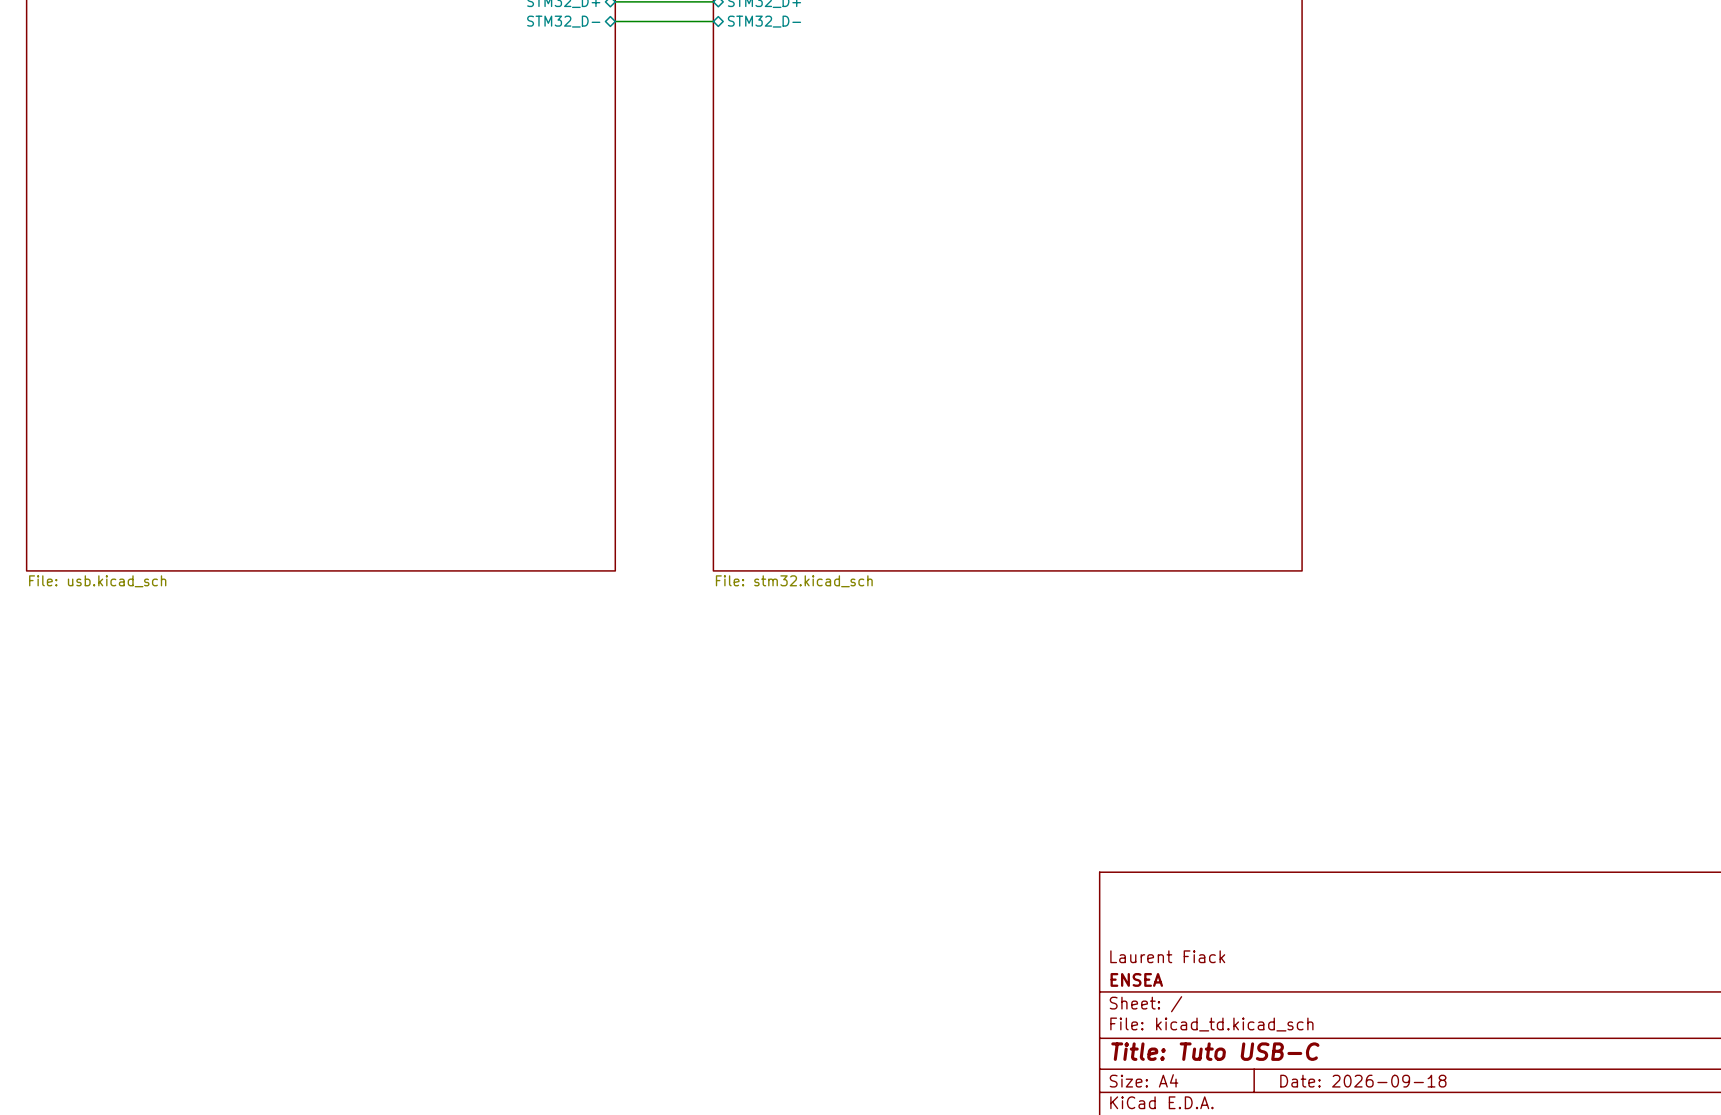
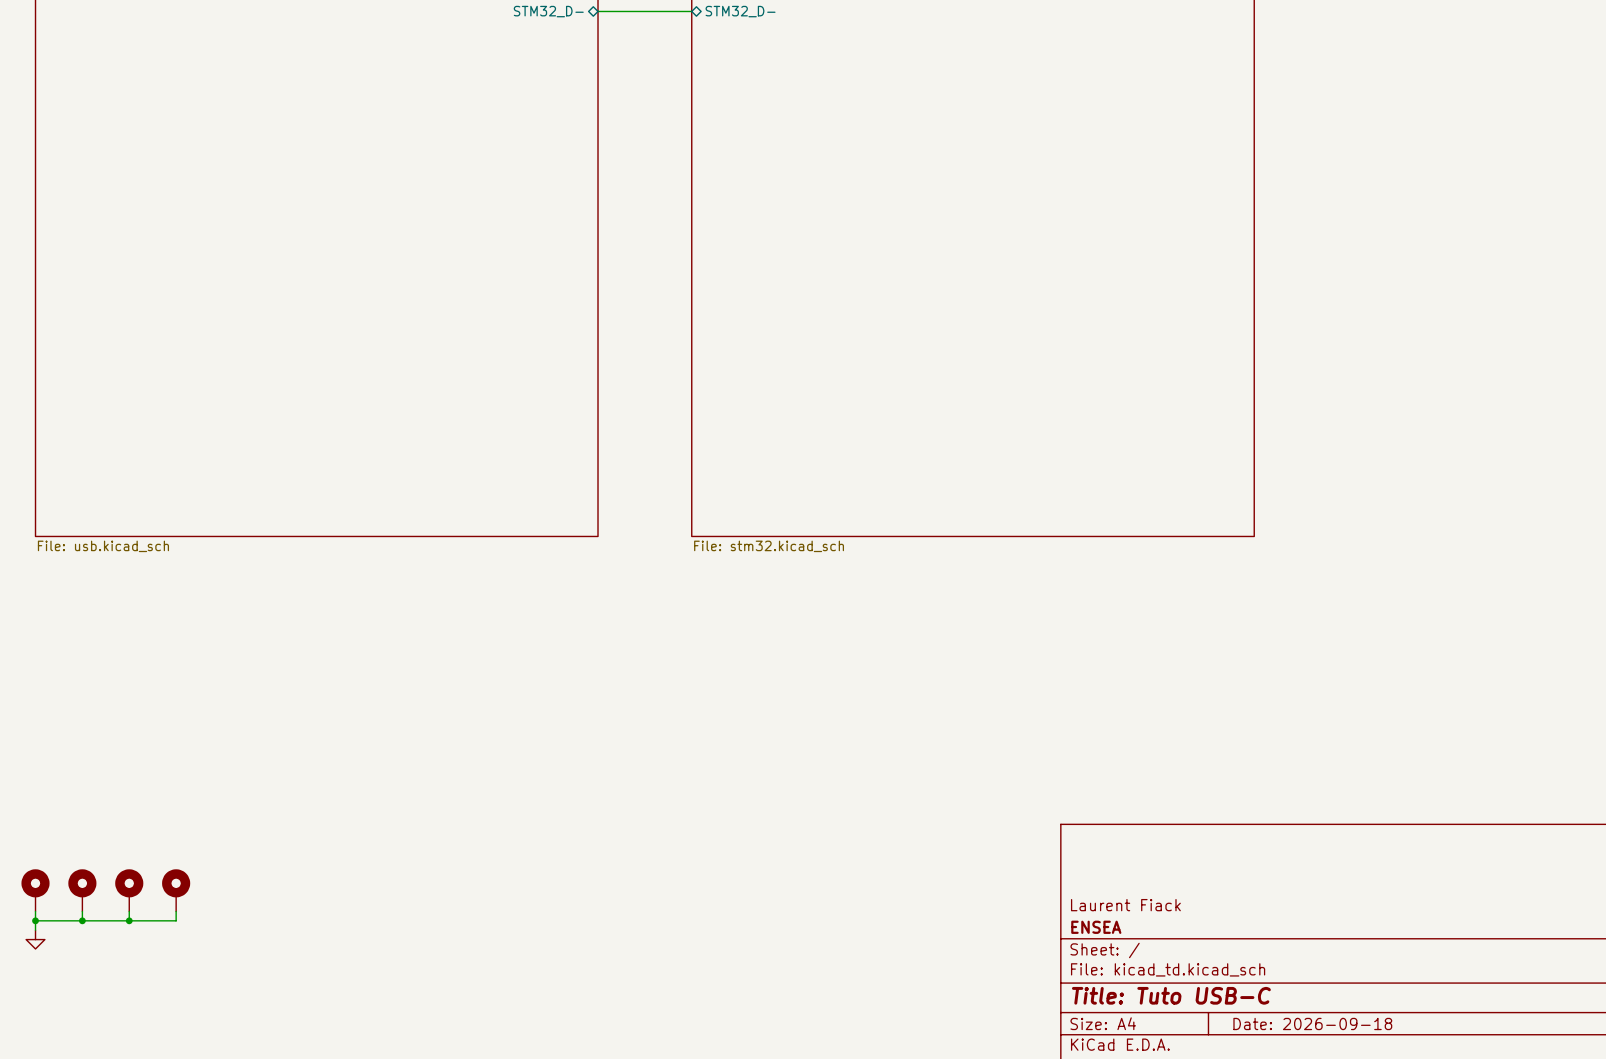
part: none -> (35, 890)
part: none -> (82, 890)
part: none -> (129, 890)
part: none -> (176, 890)
wire: none -> (35, 911) (35, 930)
wire: none -> (82, 911) (82, 920)
wire: none -> (129, 911) (129, 920)
wire: none -> (176, 911) (176, 920) (35, 920)
junction: none -> (35, 920)
junction: none -> (82, 920)
junction: none -> (129, 920)
power symbol: none -> (35, 939)

